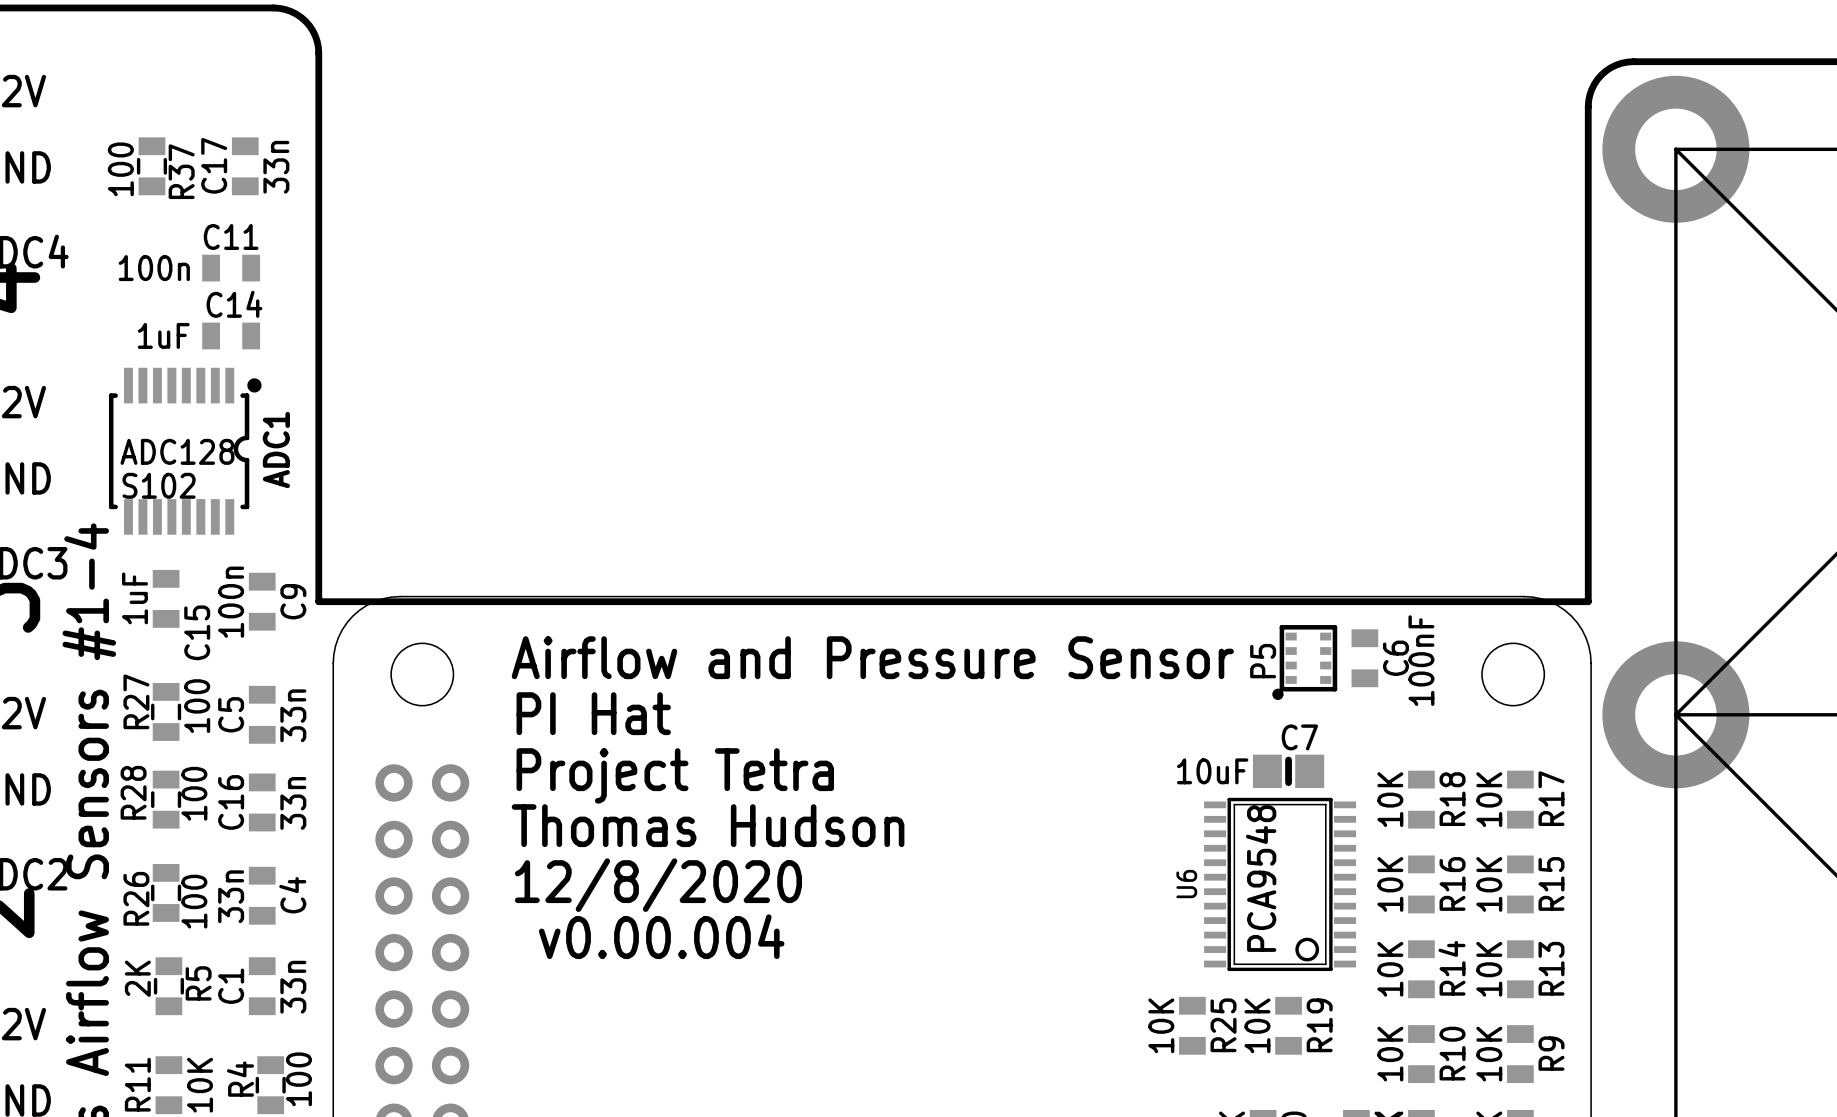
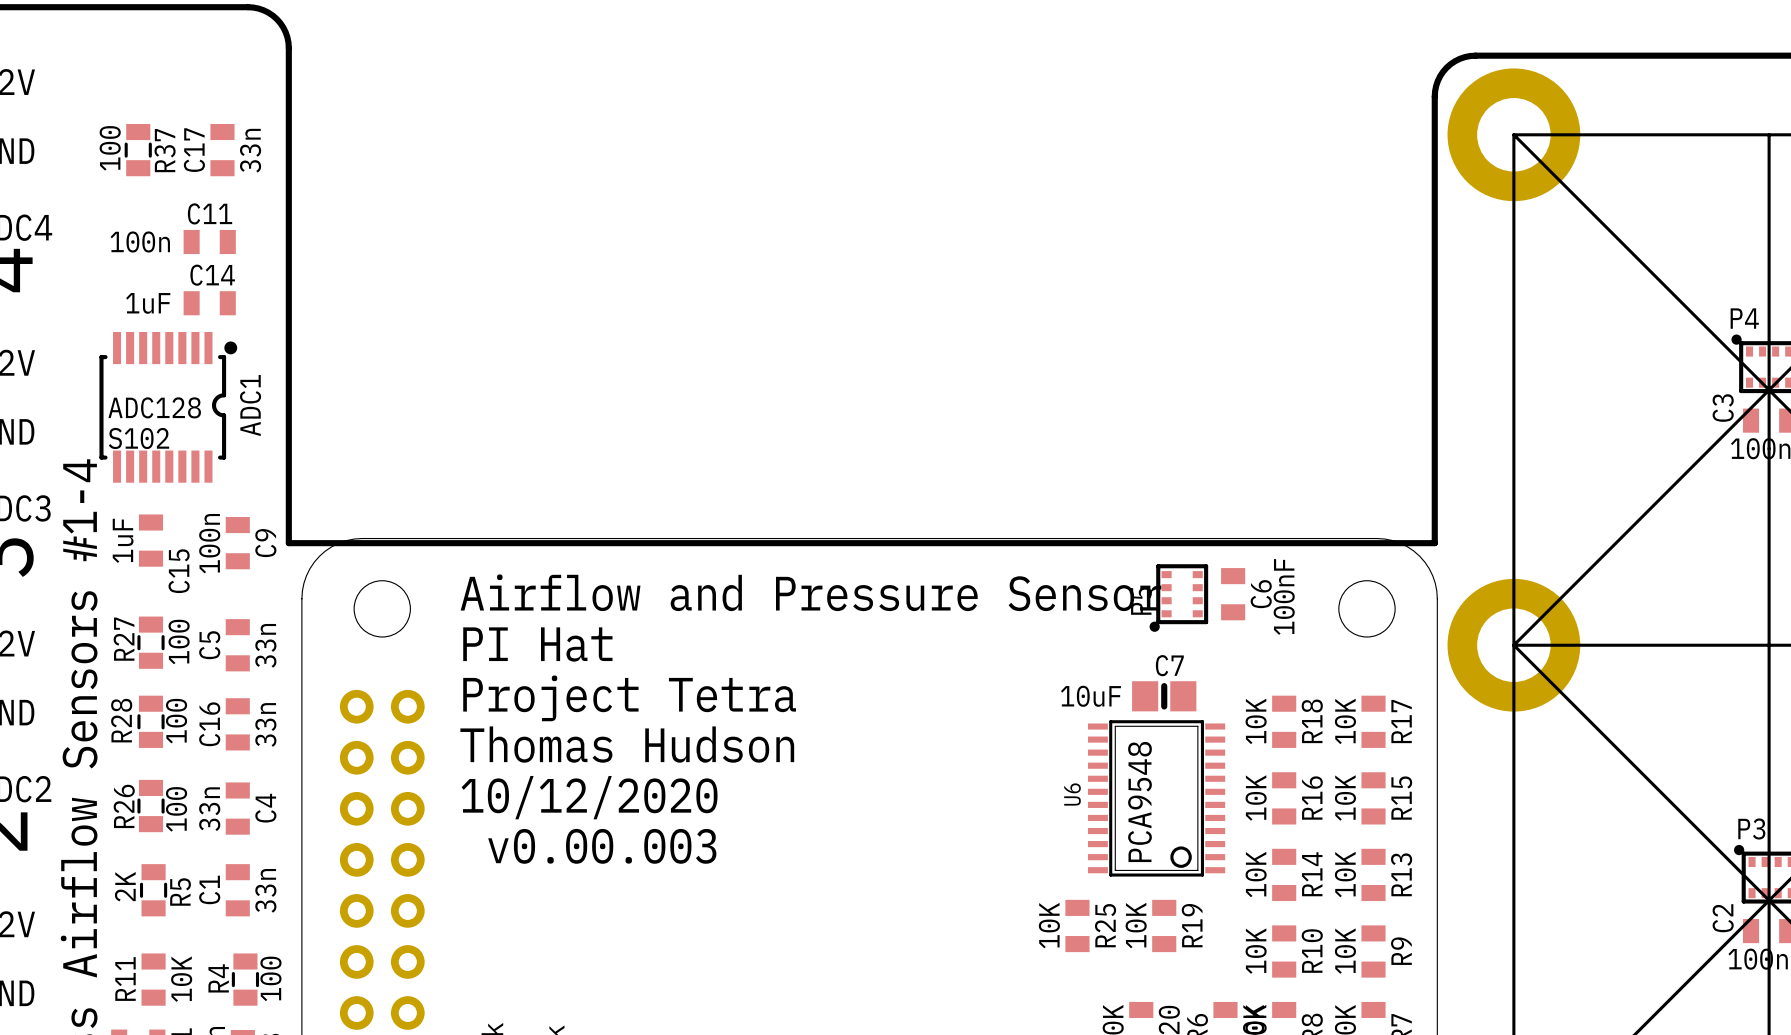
text: 12/8/2020 (658, 885) -> 10/12/2020 (589, 797)
text: v0.00.004 (661, 936) -> v0.00.003 (602, 846)

